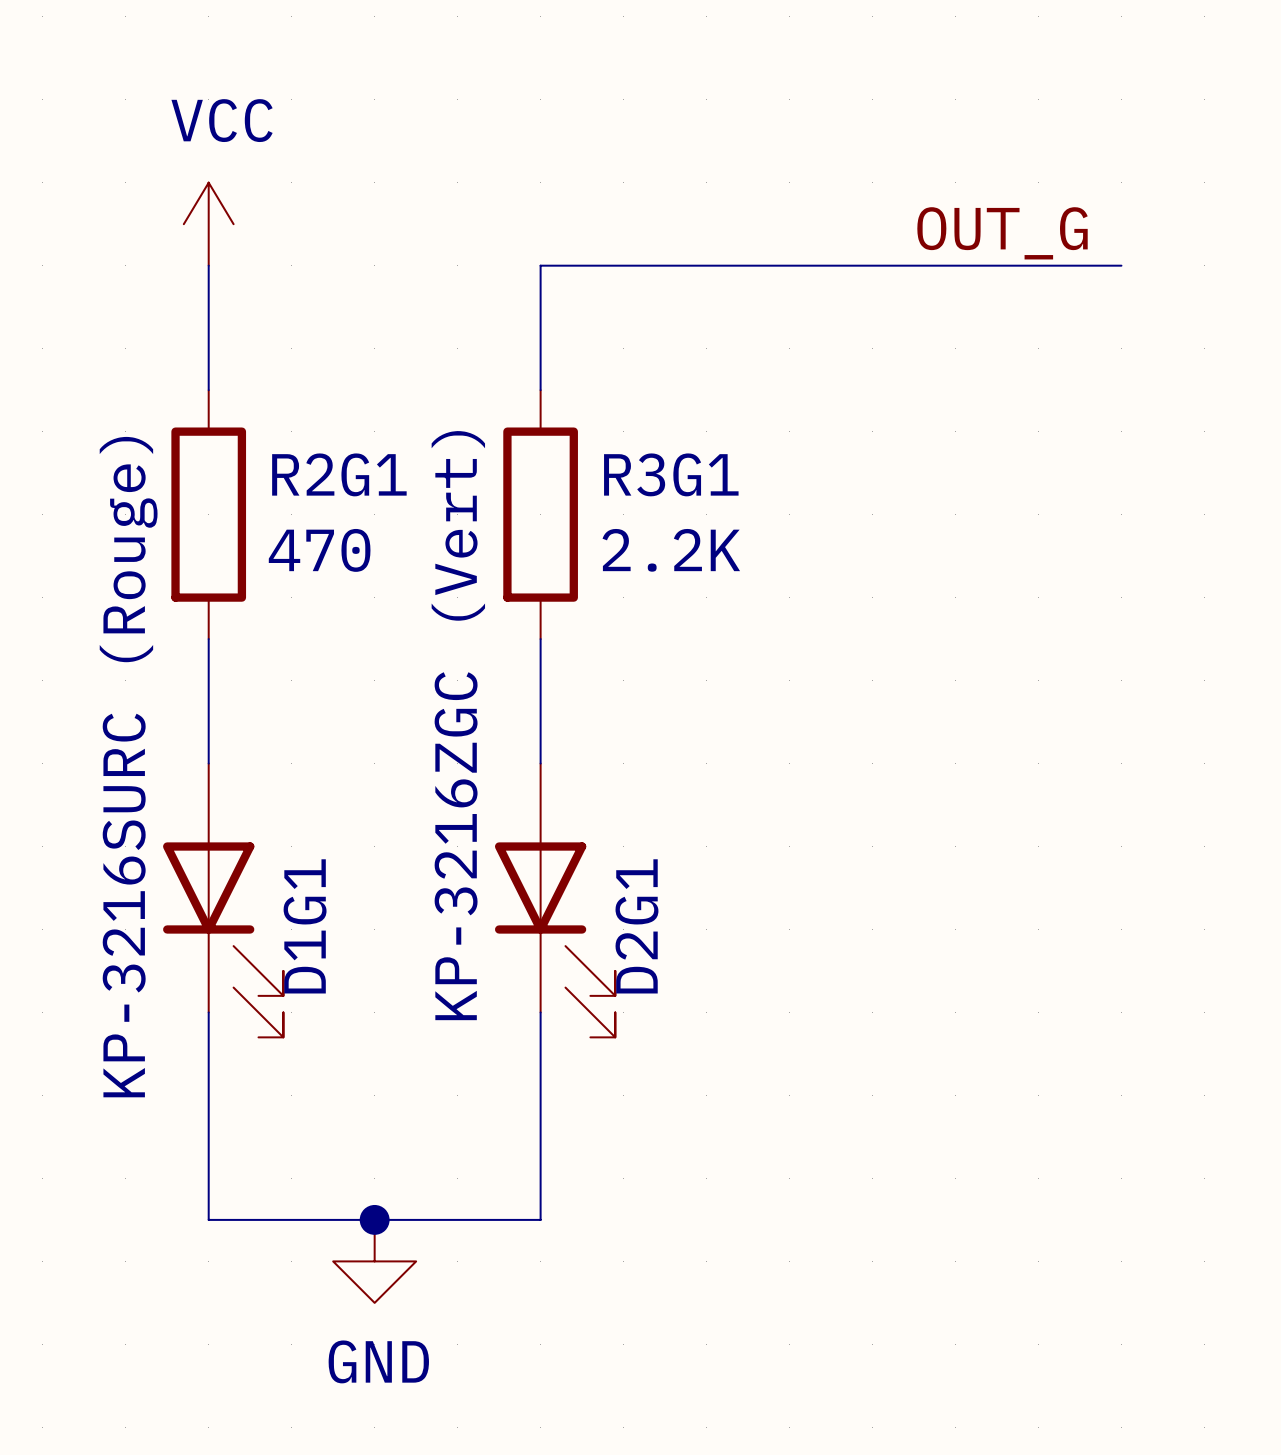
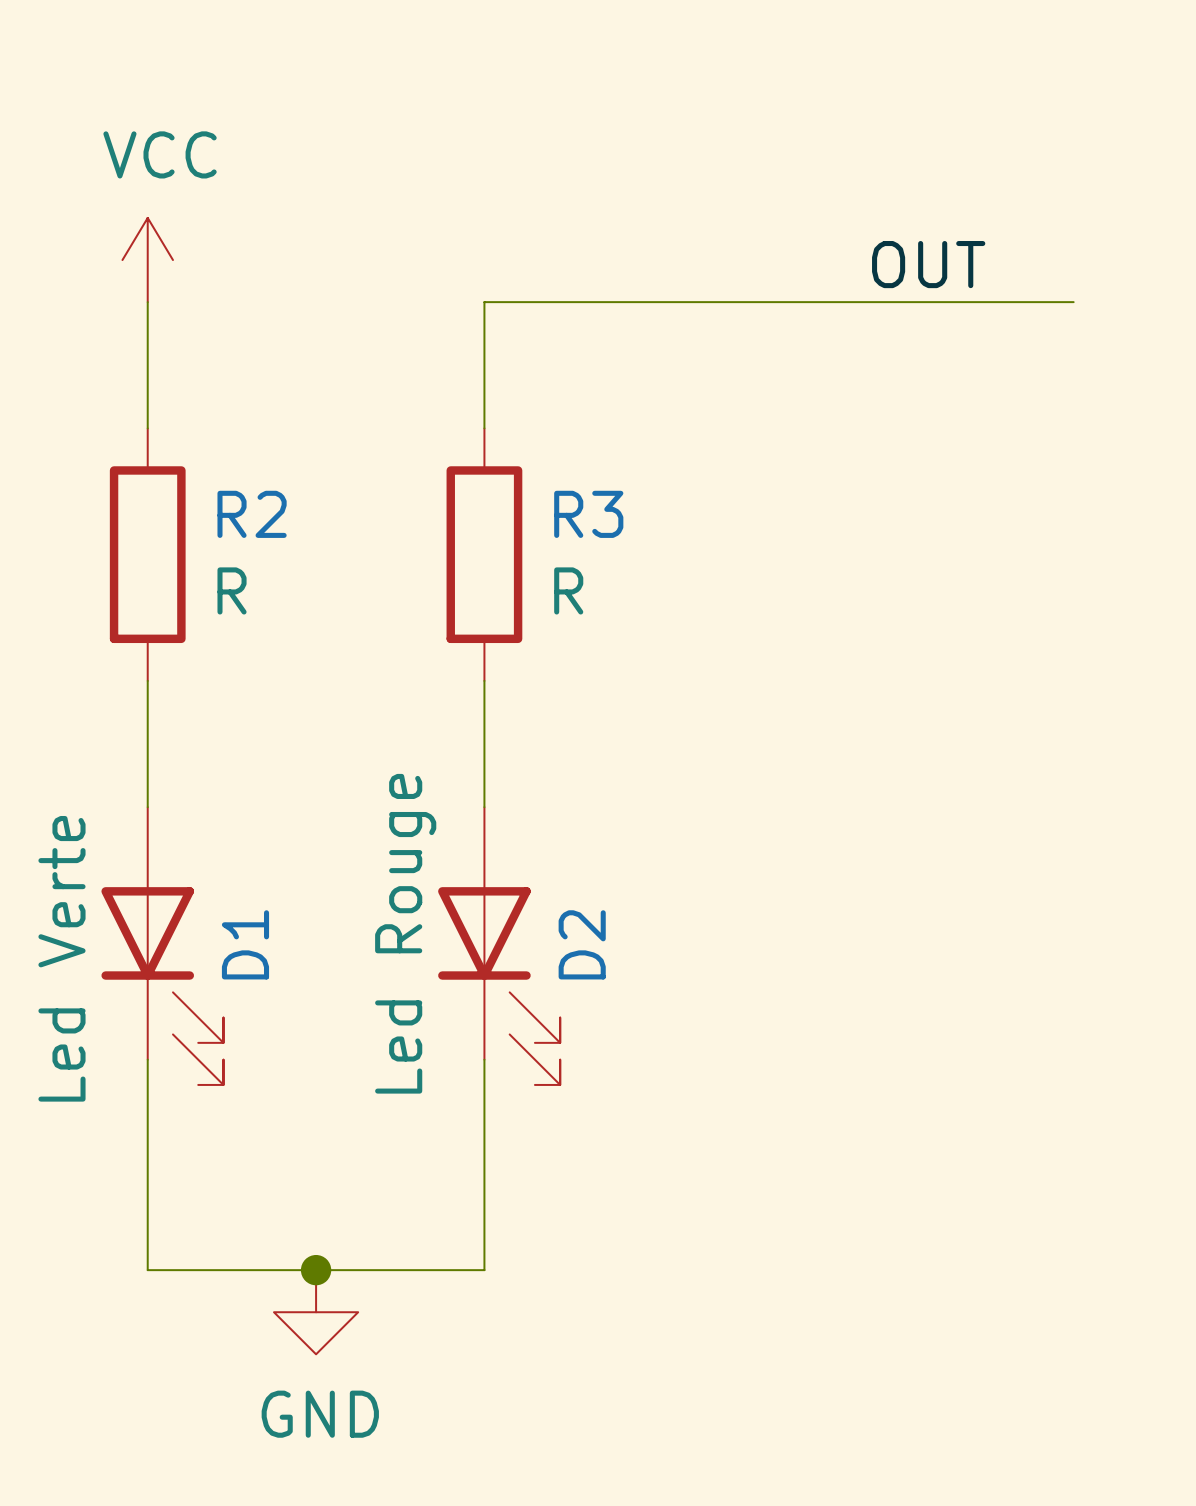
label: OUT_G (1002, 233) -> OUT (928, 264)
R2G1 name: R2G1 (339, 474) -> R2 (252, 514)
R3G1 name: R3G1 (671, 474) -> R3 (588, 514)
R2G1 value: 470 (319, 550) -> R (232, 590)
R3G1 value: 2.2K (671, 550) -> R (568, 590)
D2G1 value: KP-3216ZGC (Vert) (458, 725) -> Led Rouge (405, 933)
D1G1 value: KP-3216SURC (Rouge) (128, 767) -> Led Verte (61, 958)
D1G1 name: D1G1 (305, 926) -> D1 (245, 944)
D2G1 name: D2G1 (636, 926) -> D2 (582, 944)

